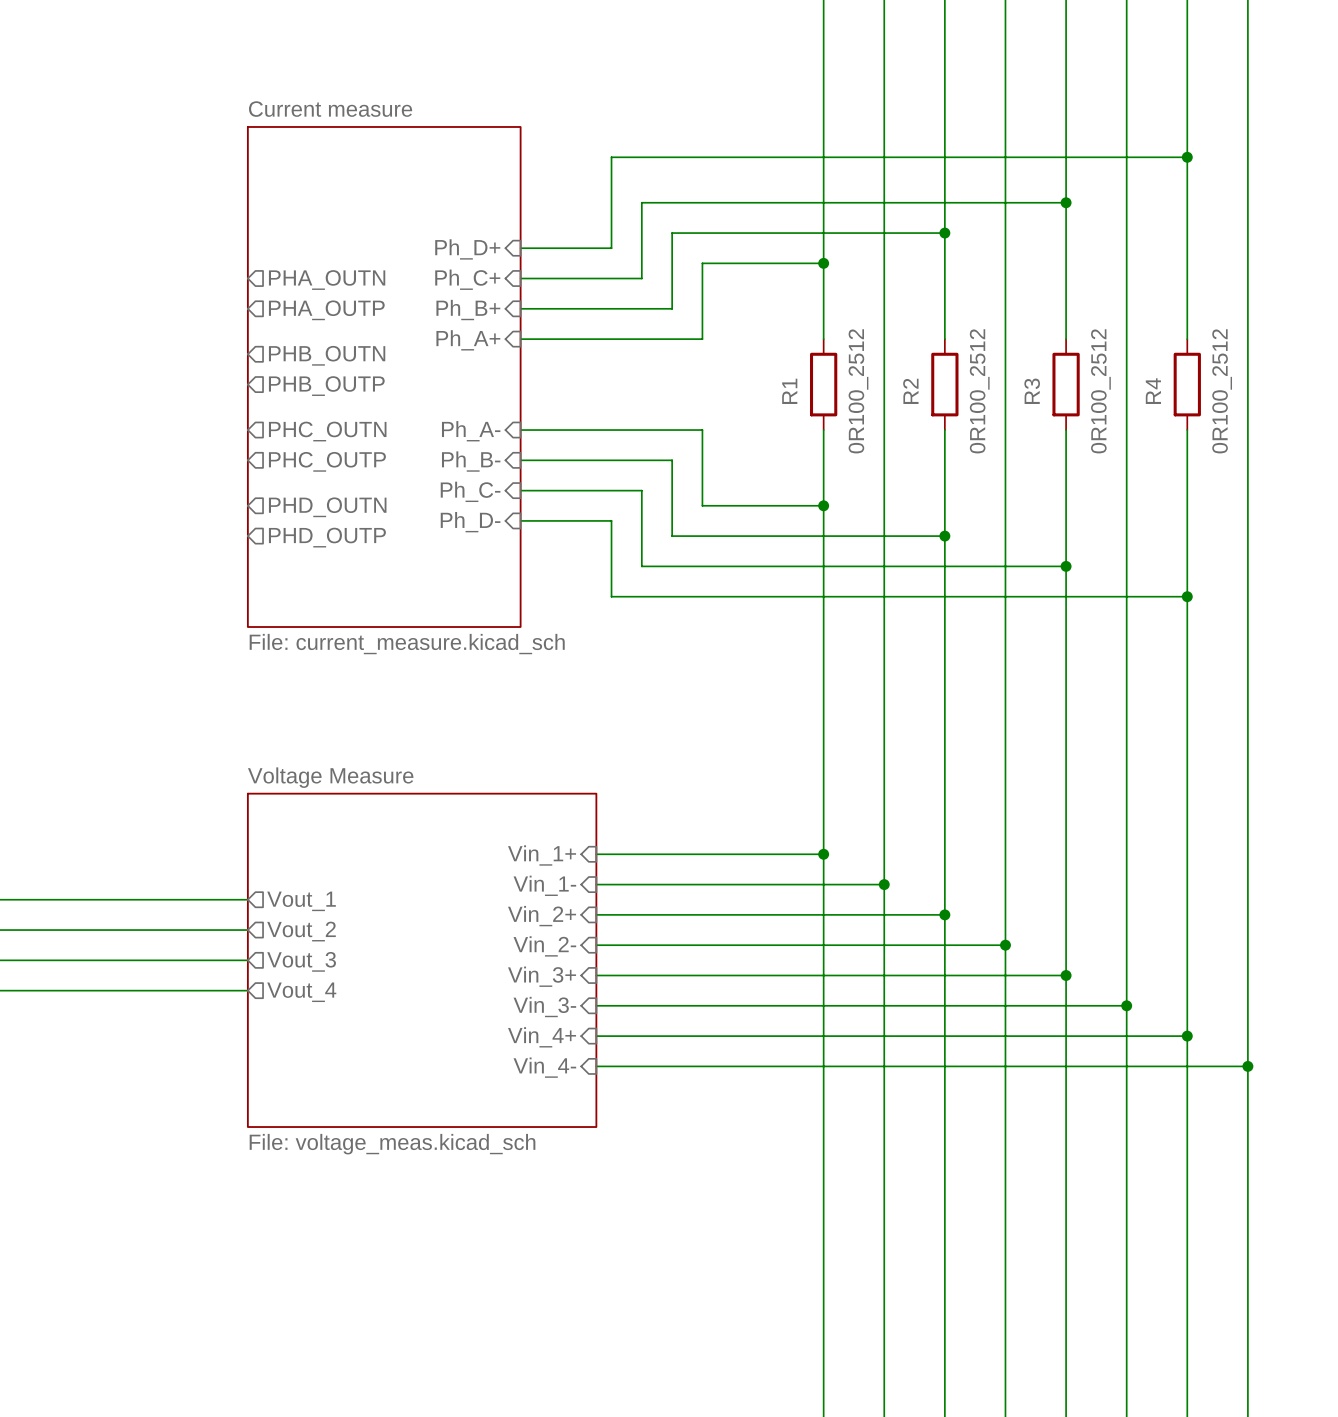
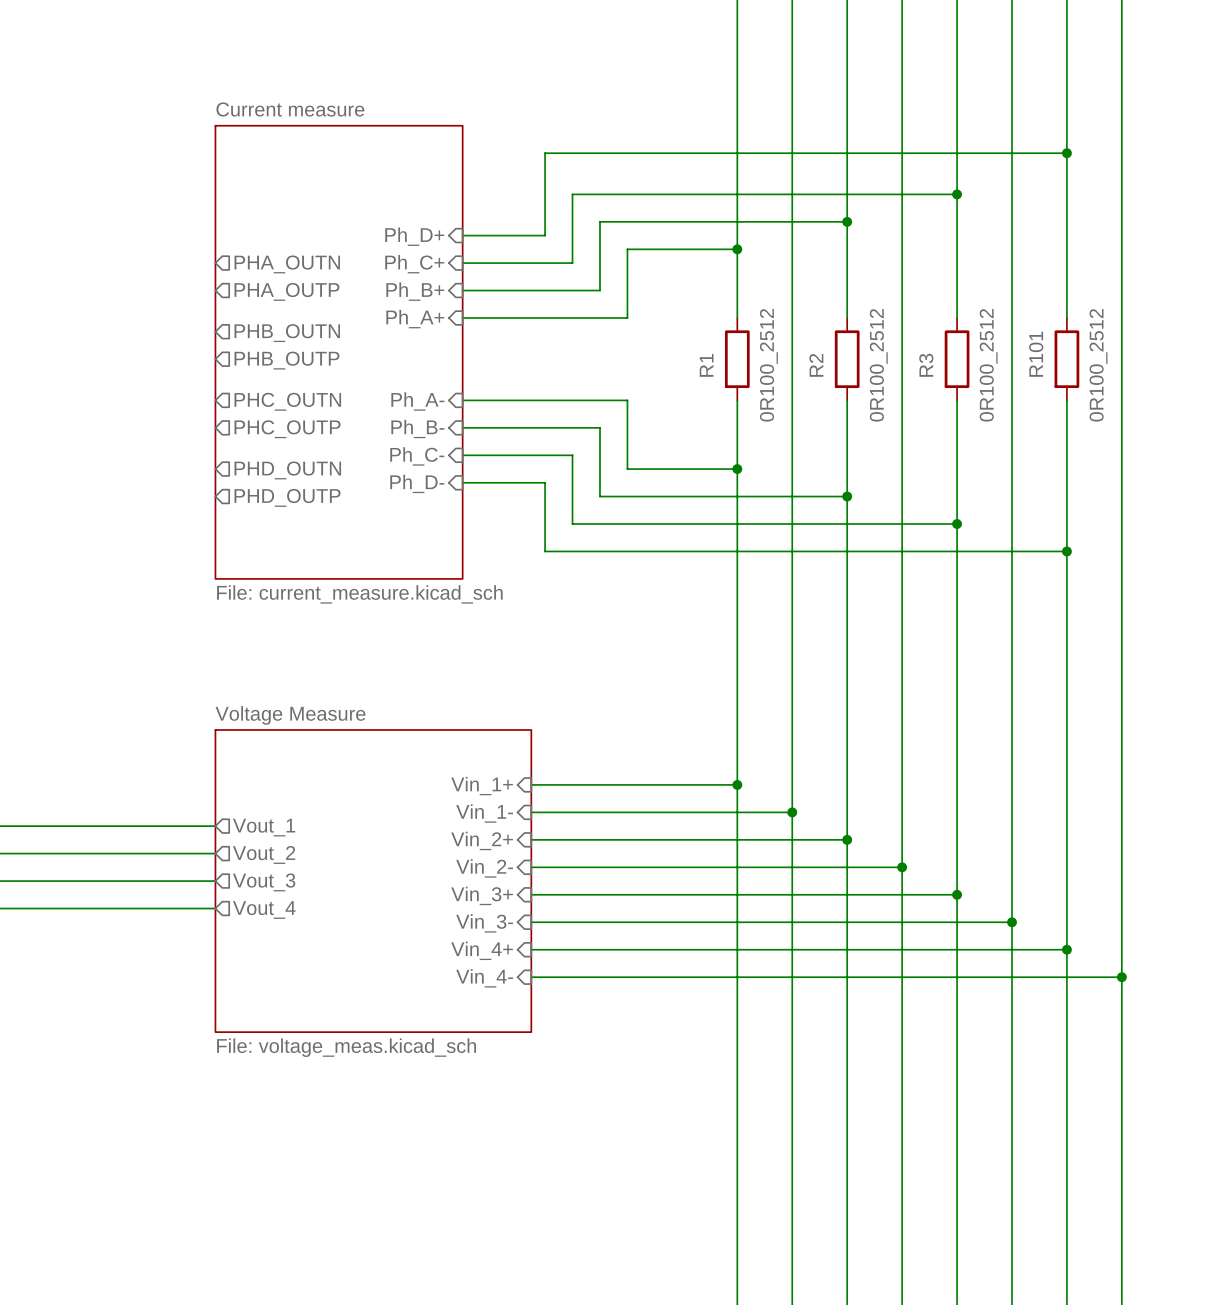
R4 name: R4 (1153, 391) -> R101 (1036, 354)

